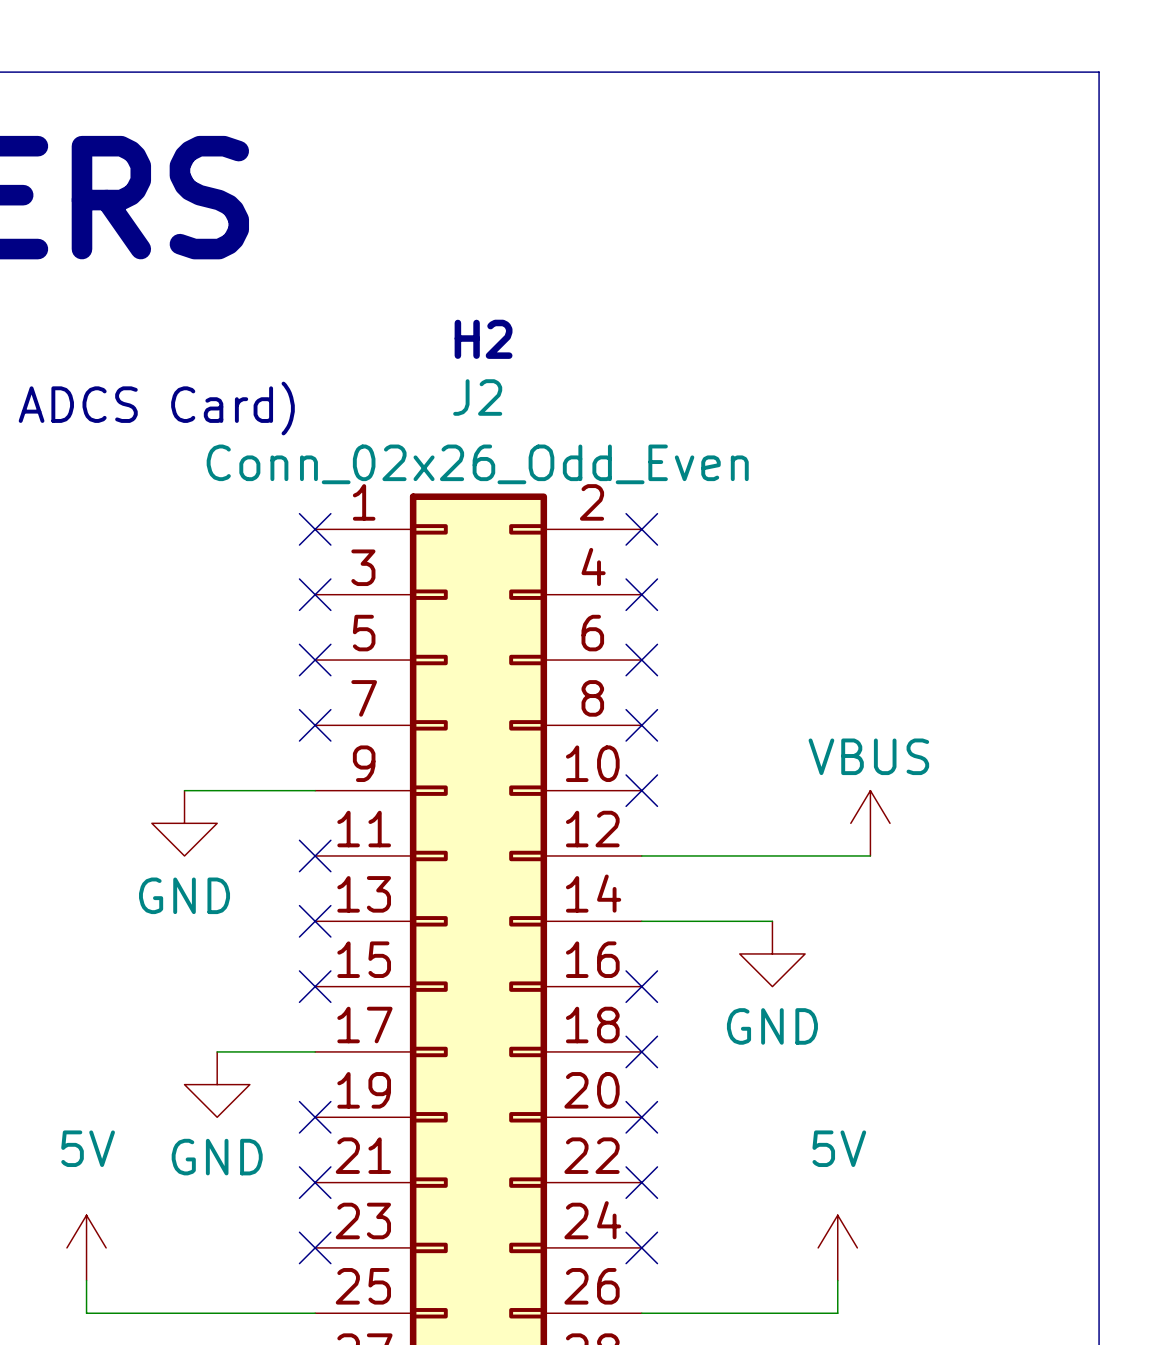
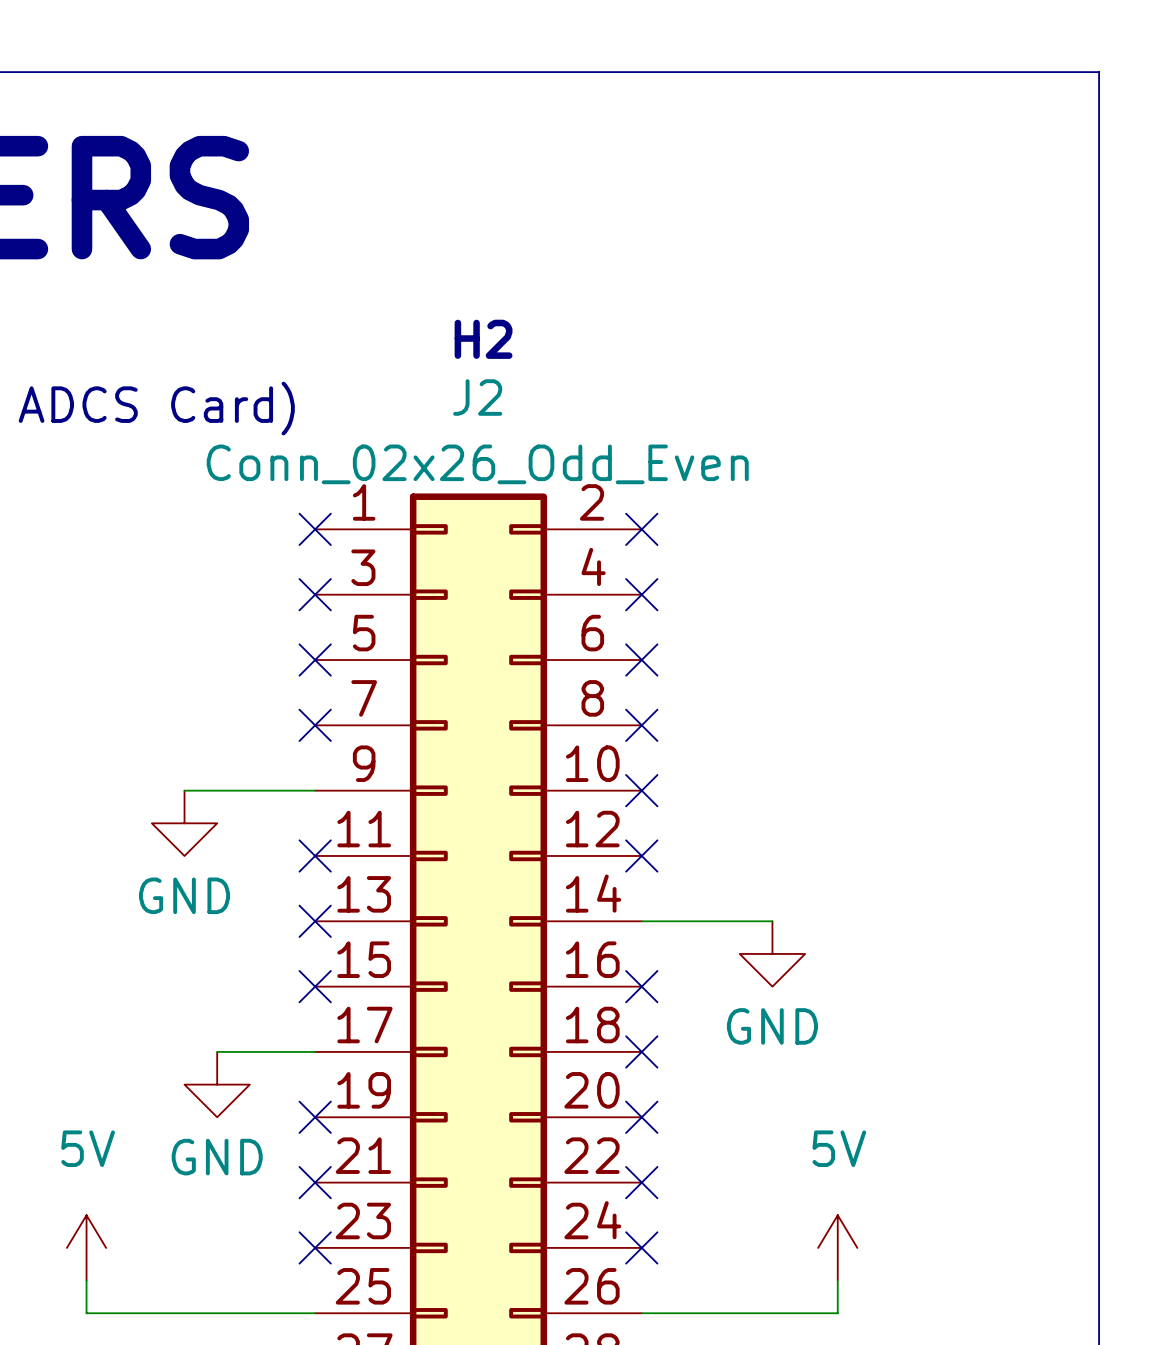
power symbol: VBUS (870, 823) -> none
wire: (641, 855) (870, 855) -> none
no-connect mark: none -> (641, 855)

